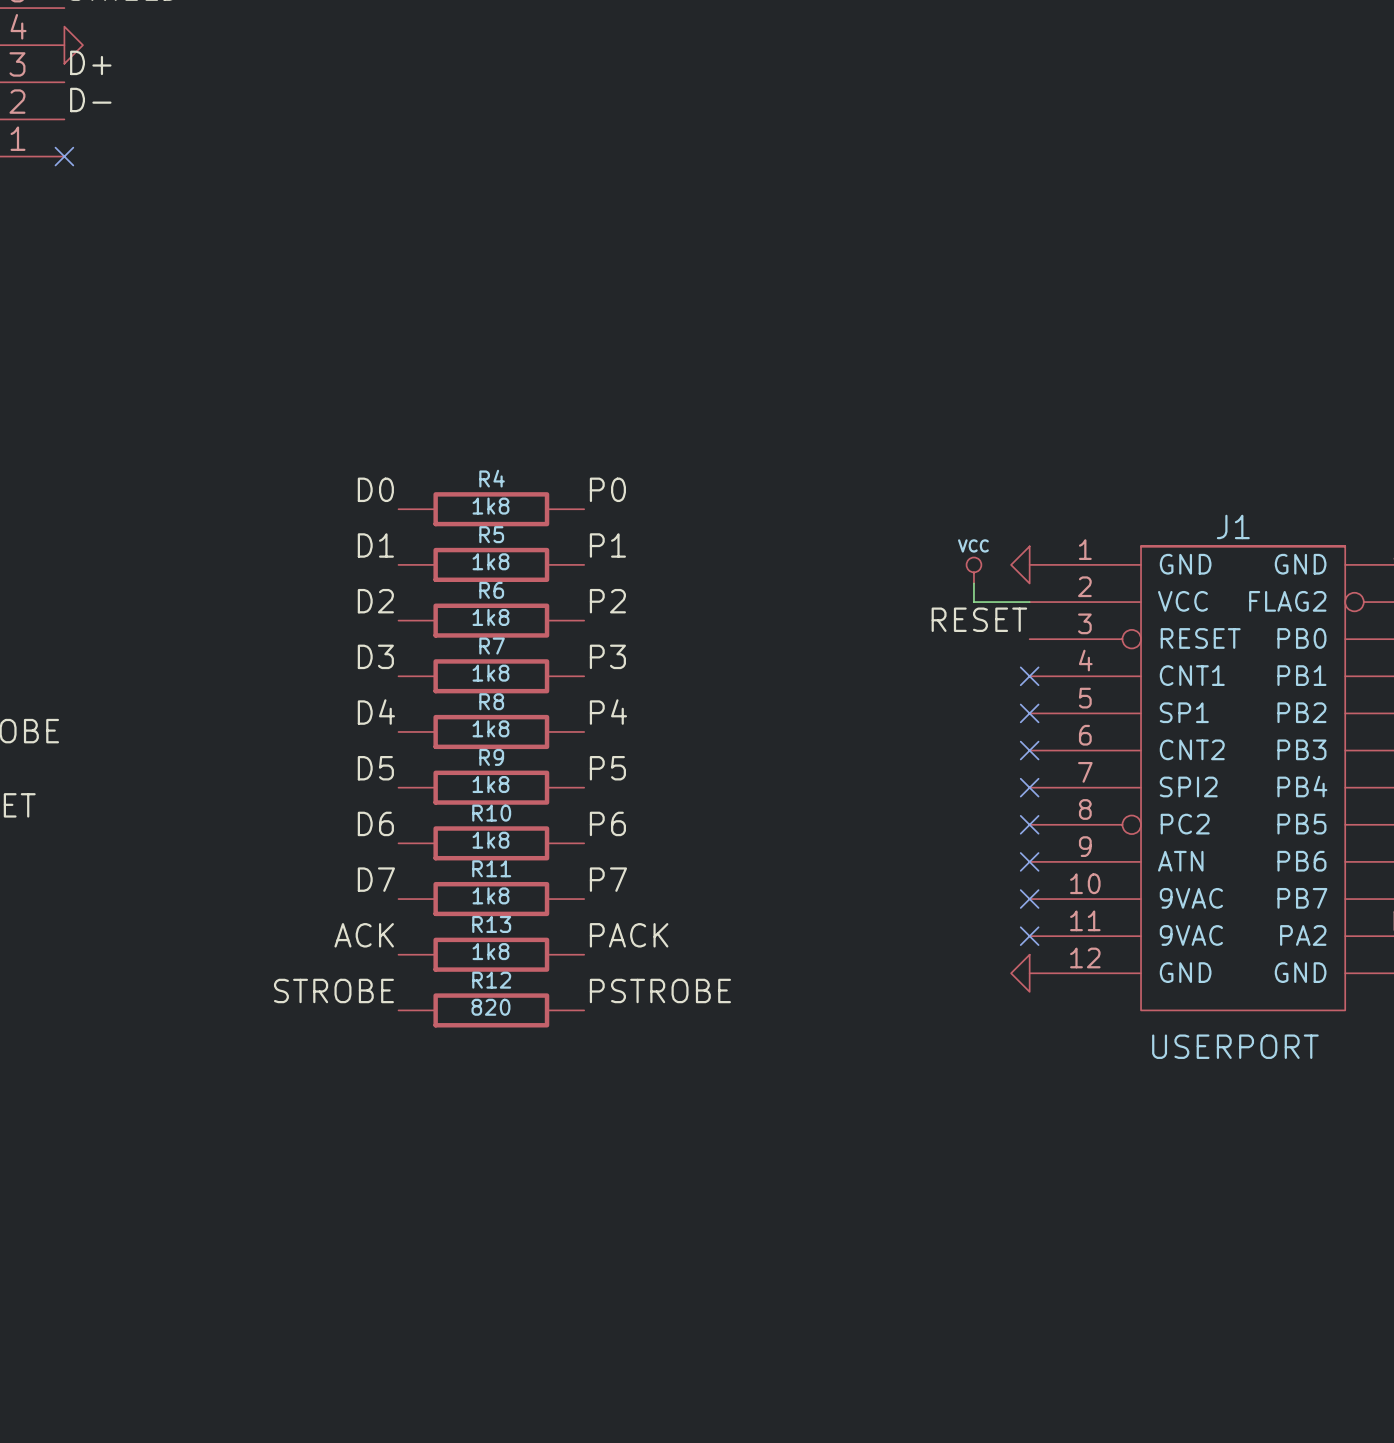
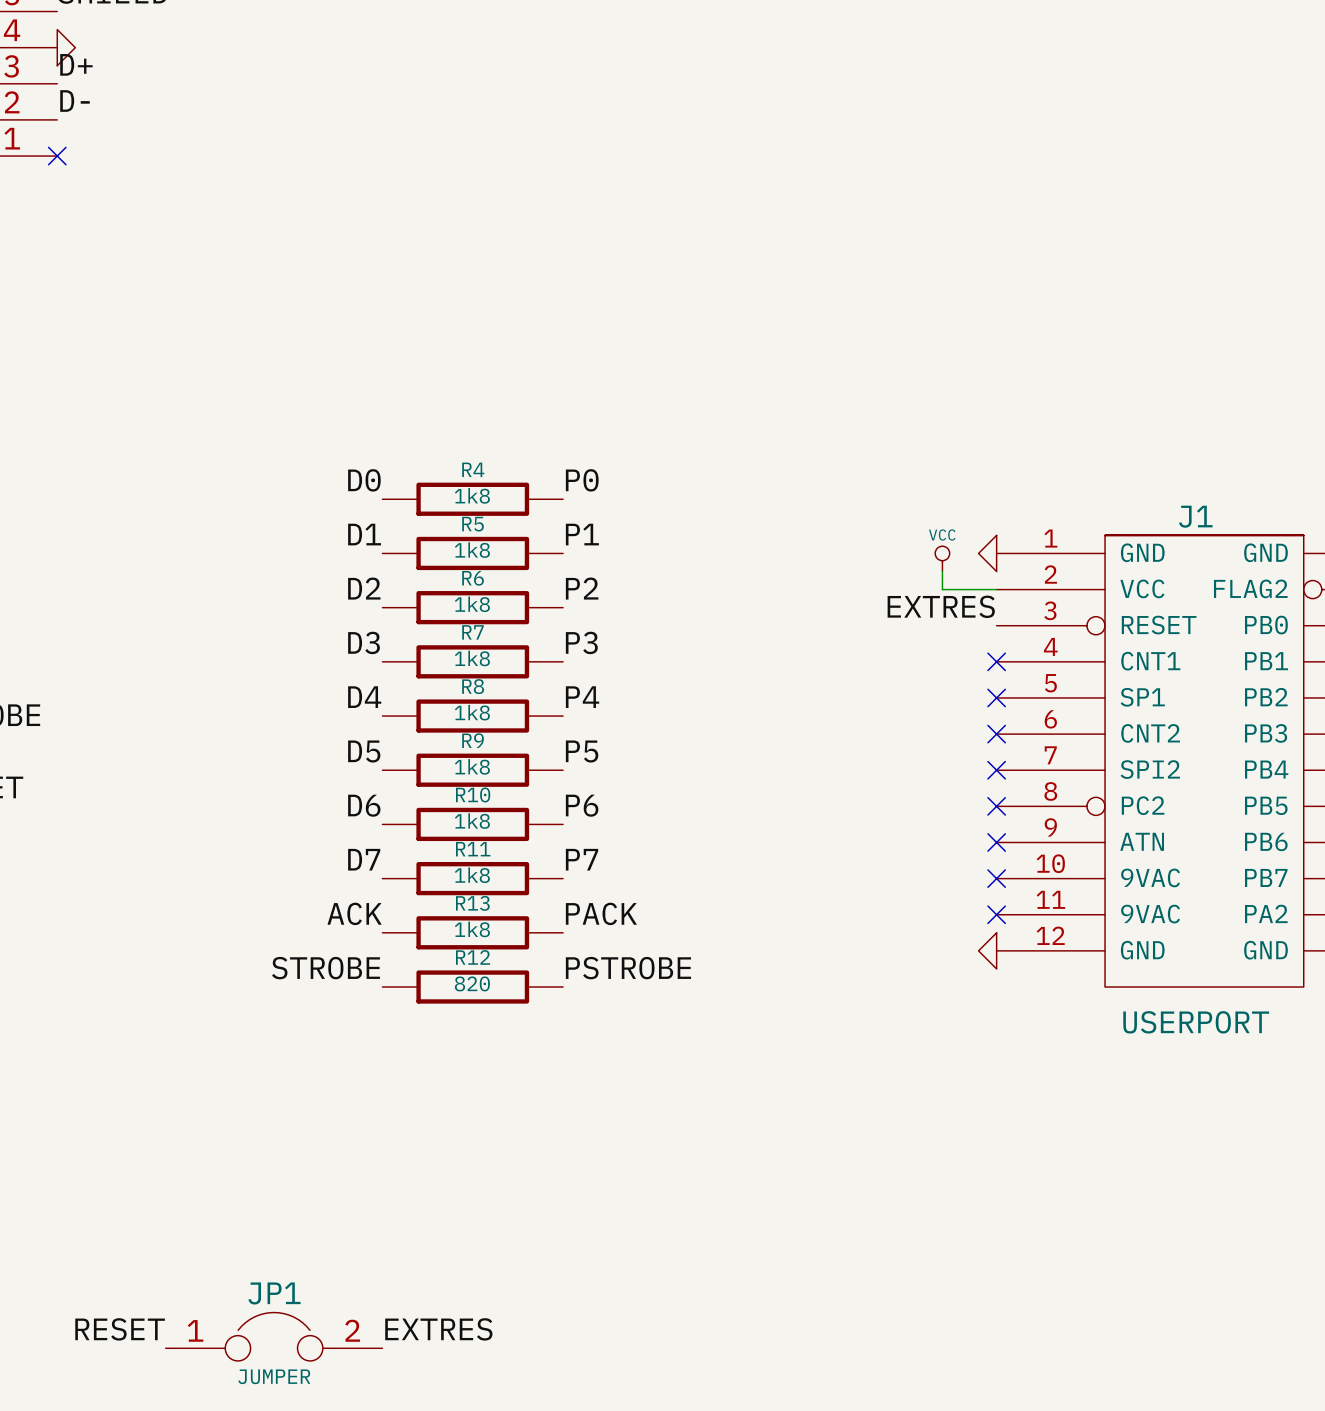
label: RESET (979, 619) -> EXTRES (941, 606)
label: none -> RESET (120, 1329)
label: none -> EXTRES (438, 1329)
JP1: none -> JUMPER (274, 1336)

